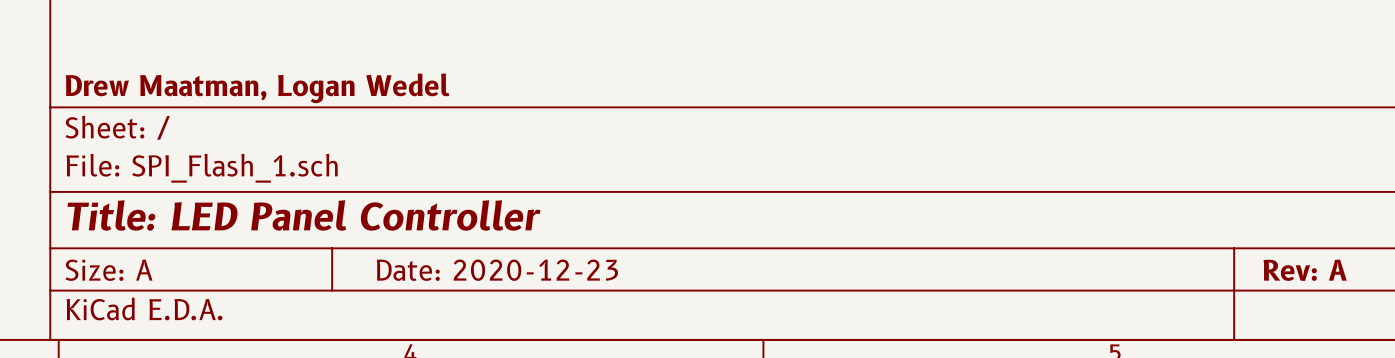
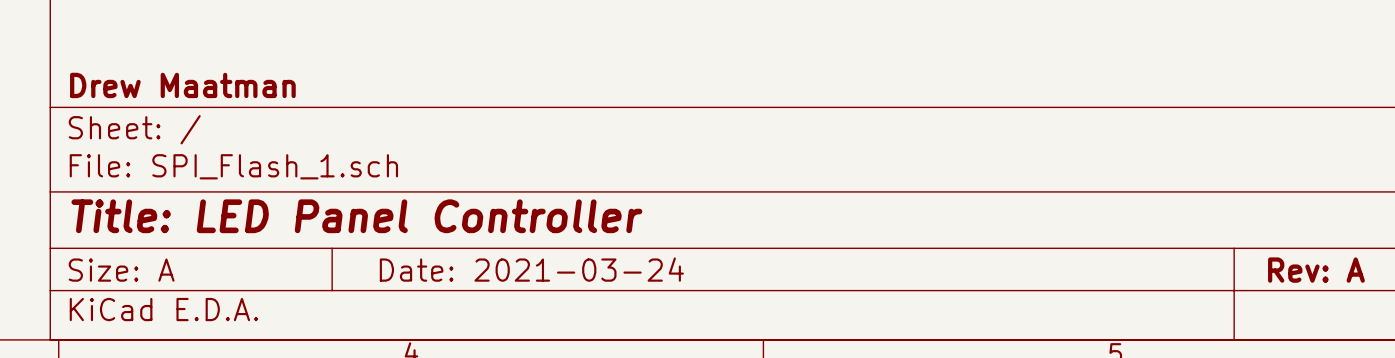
title block: Drew Maatman, Logan Wedel (257, 88) -> Drew Maatman (182, 85)
title block: Date: 2020-12-23 (497, 270) -> Date: 2021-03-24 (531, 269)

